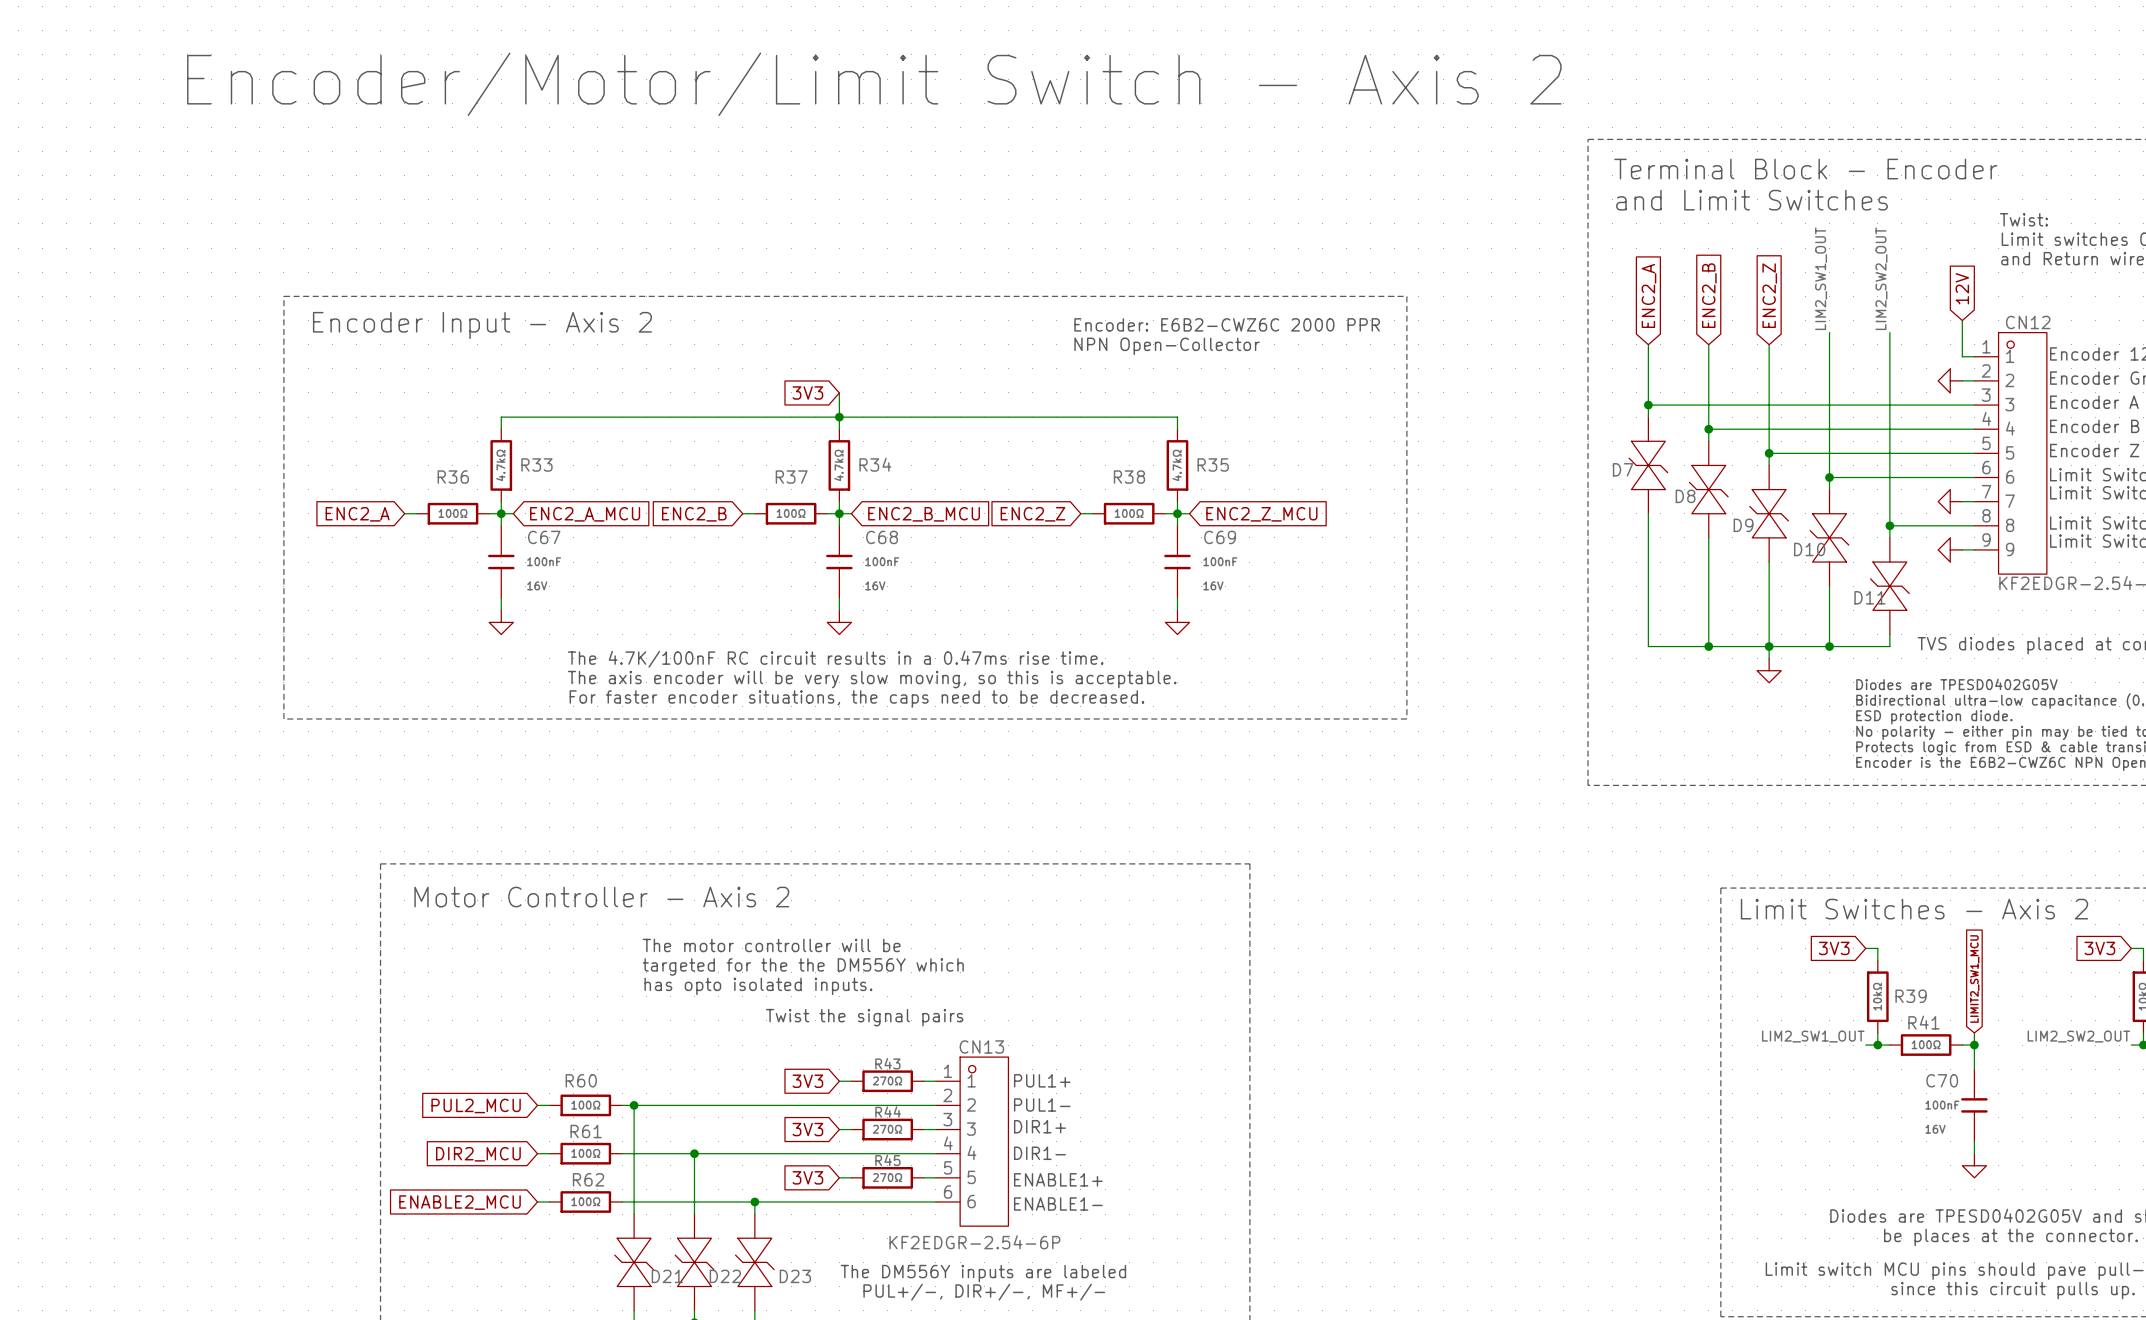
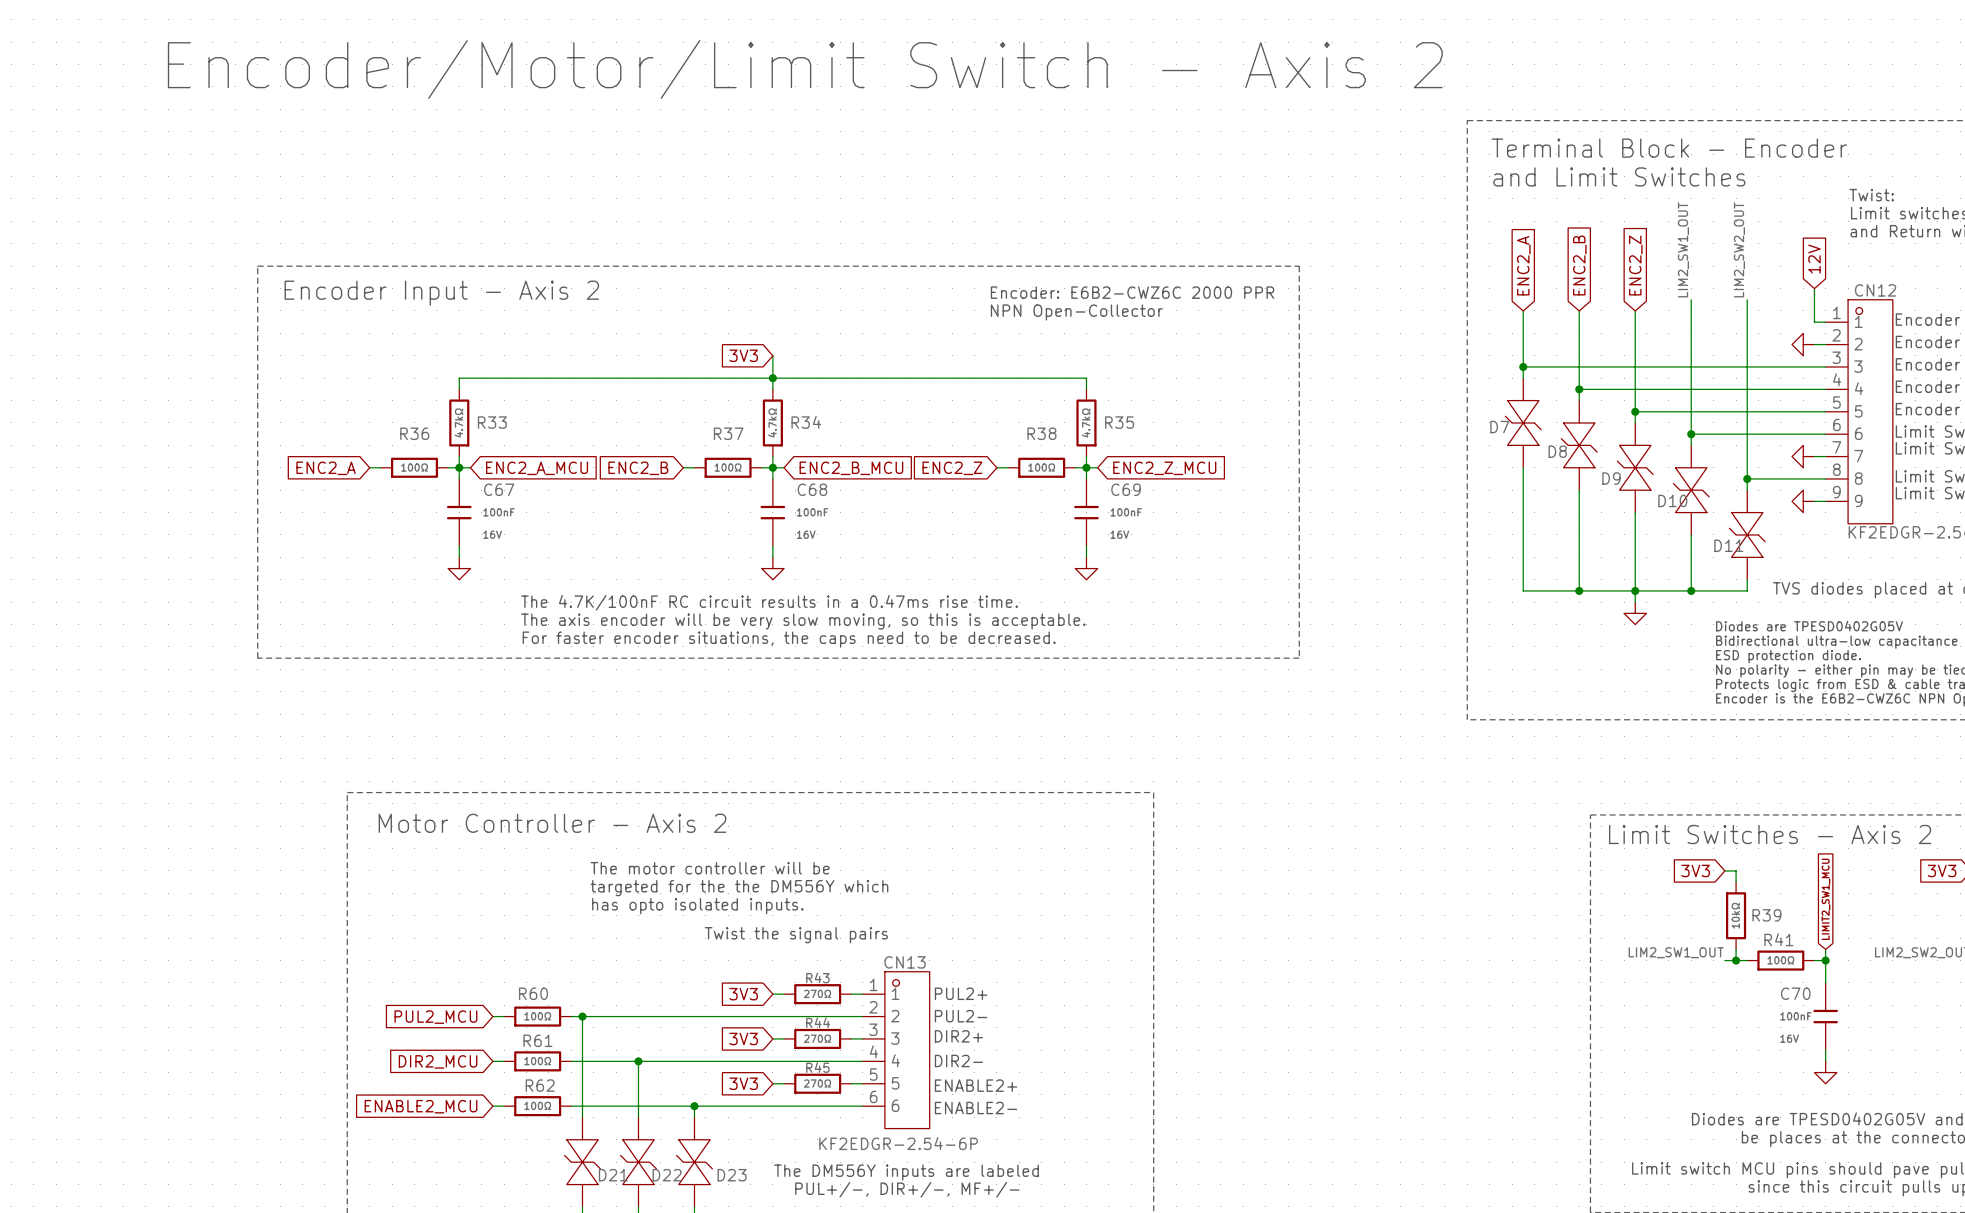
text: PUL1+ (1042, 1080) -> PUL2+ (961, 993)
text: PUL1- (1042, 1104) -> PUL2- (961, 1016)
text: DIR1+ (1039, 1126) -> DIR2+ (958, 1036)
text: DIR1- (1039, 1153) -> DIR2- (958, 1060)
text: ENABLE1+ (1058, 1179) -> ENABLE2+ (976, 1085)
text: ENABLE1- (1058, 1204) -> ENABLE2- (976, 1108)

